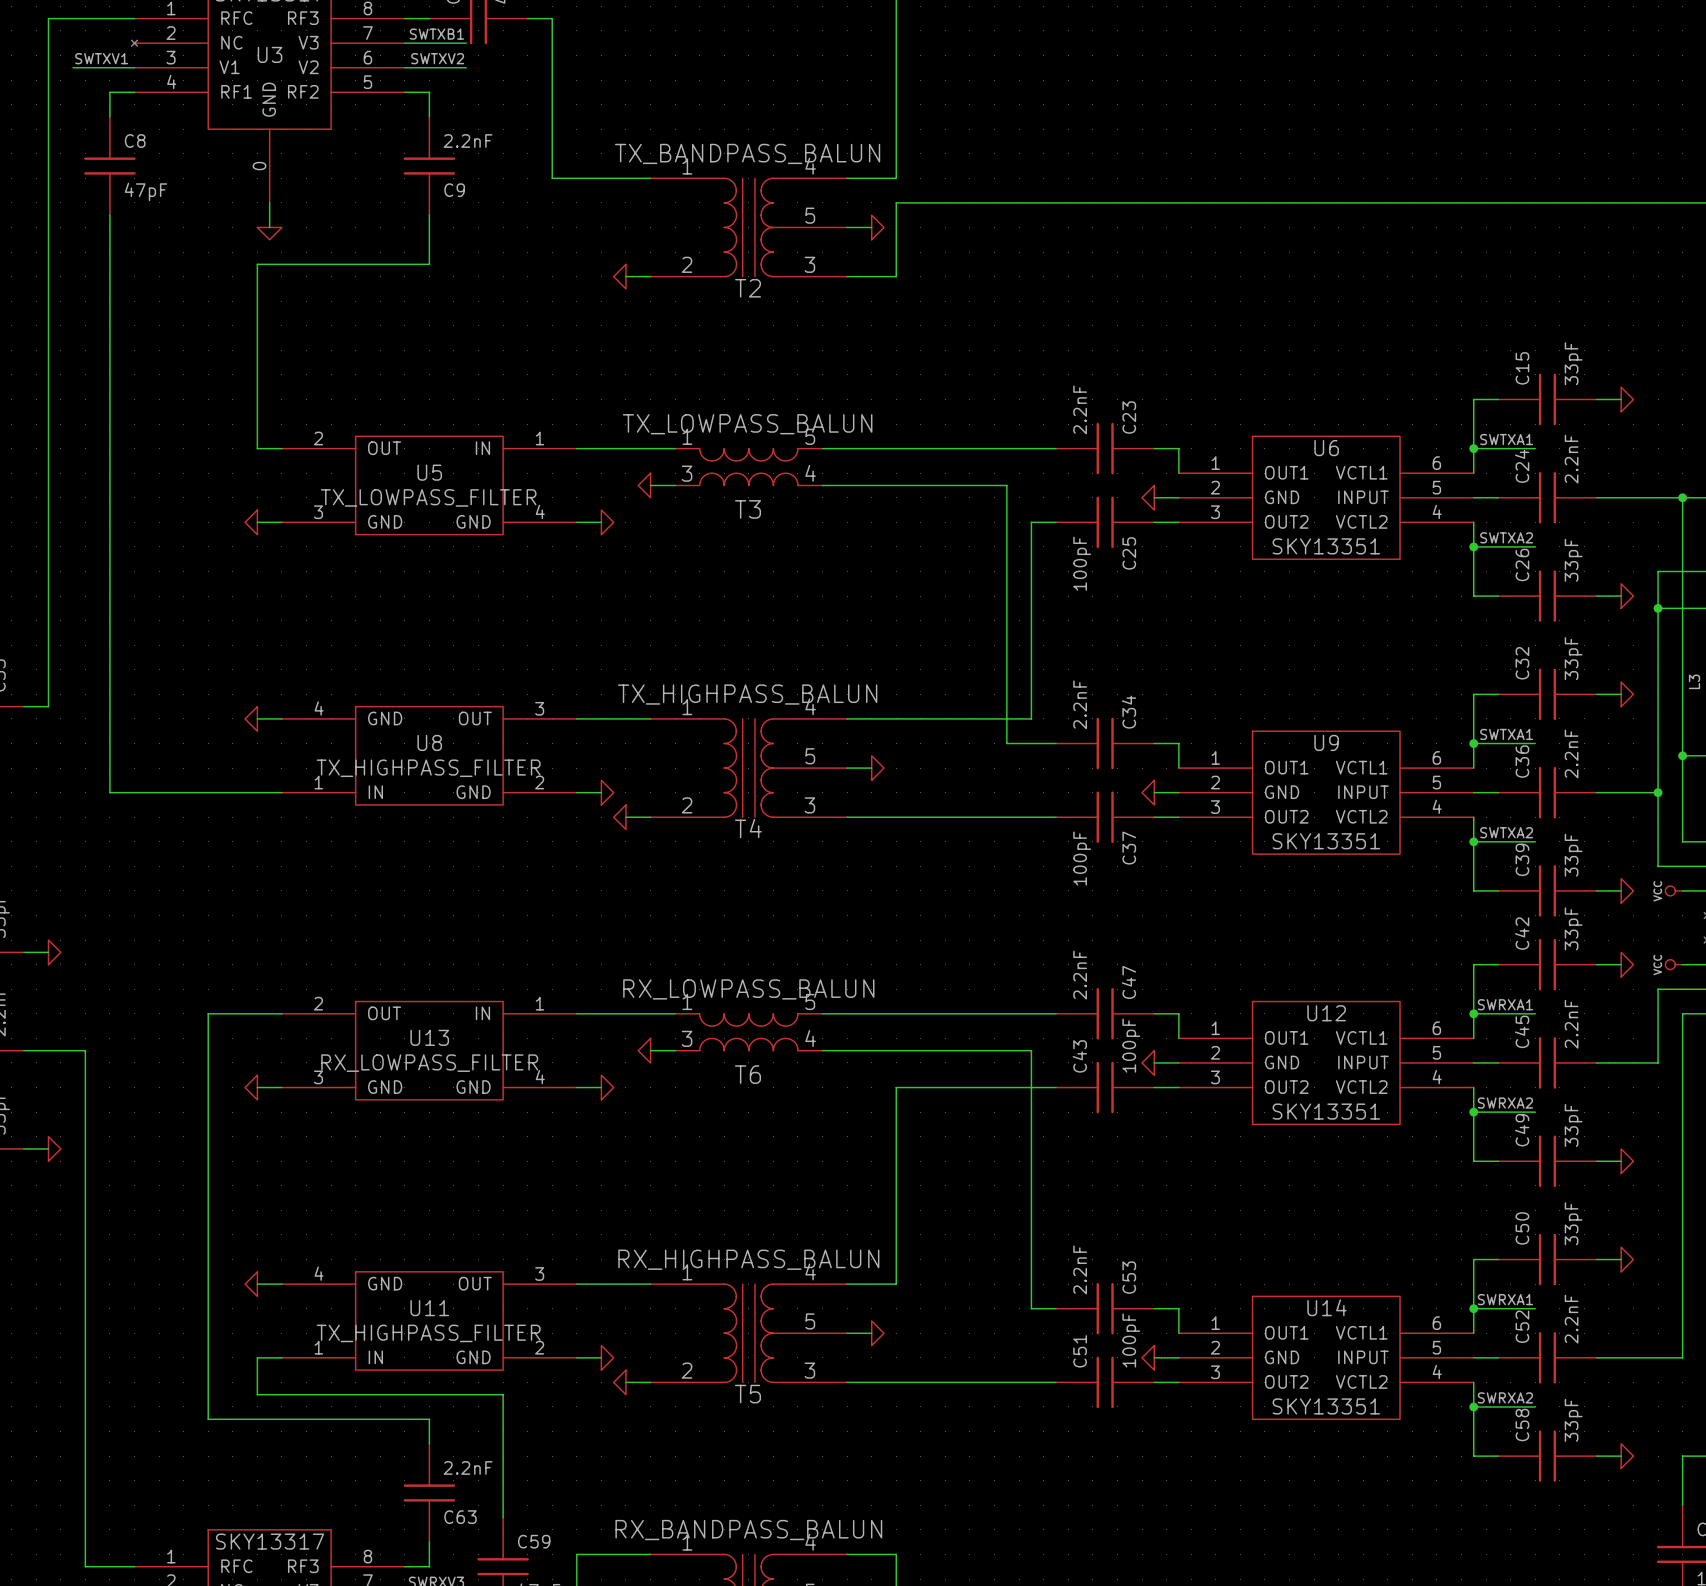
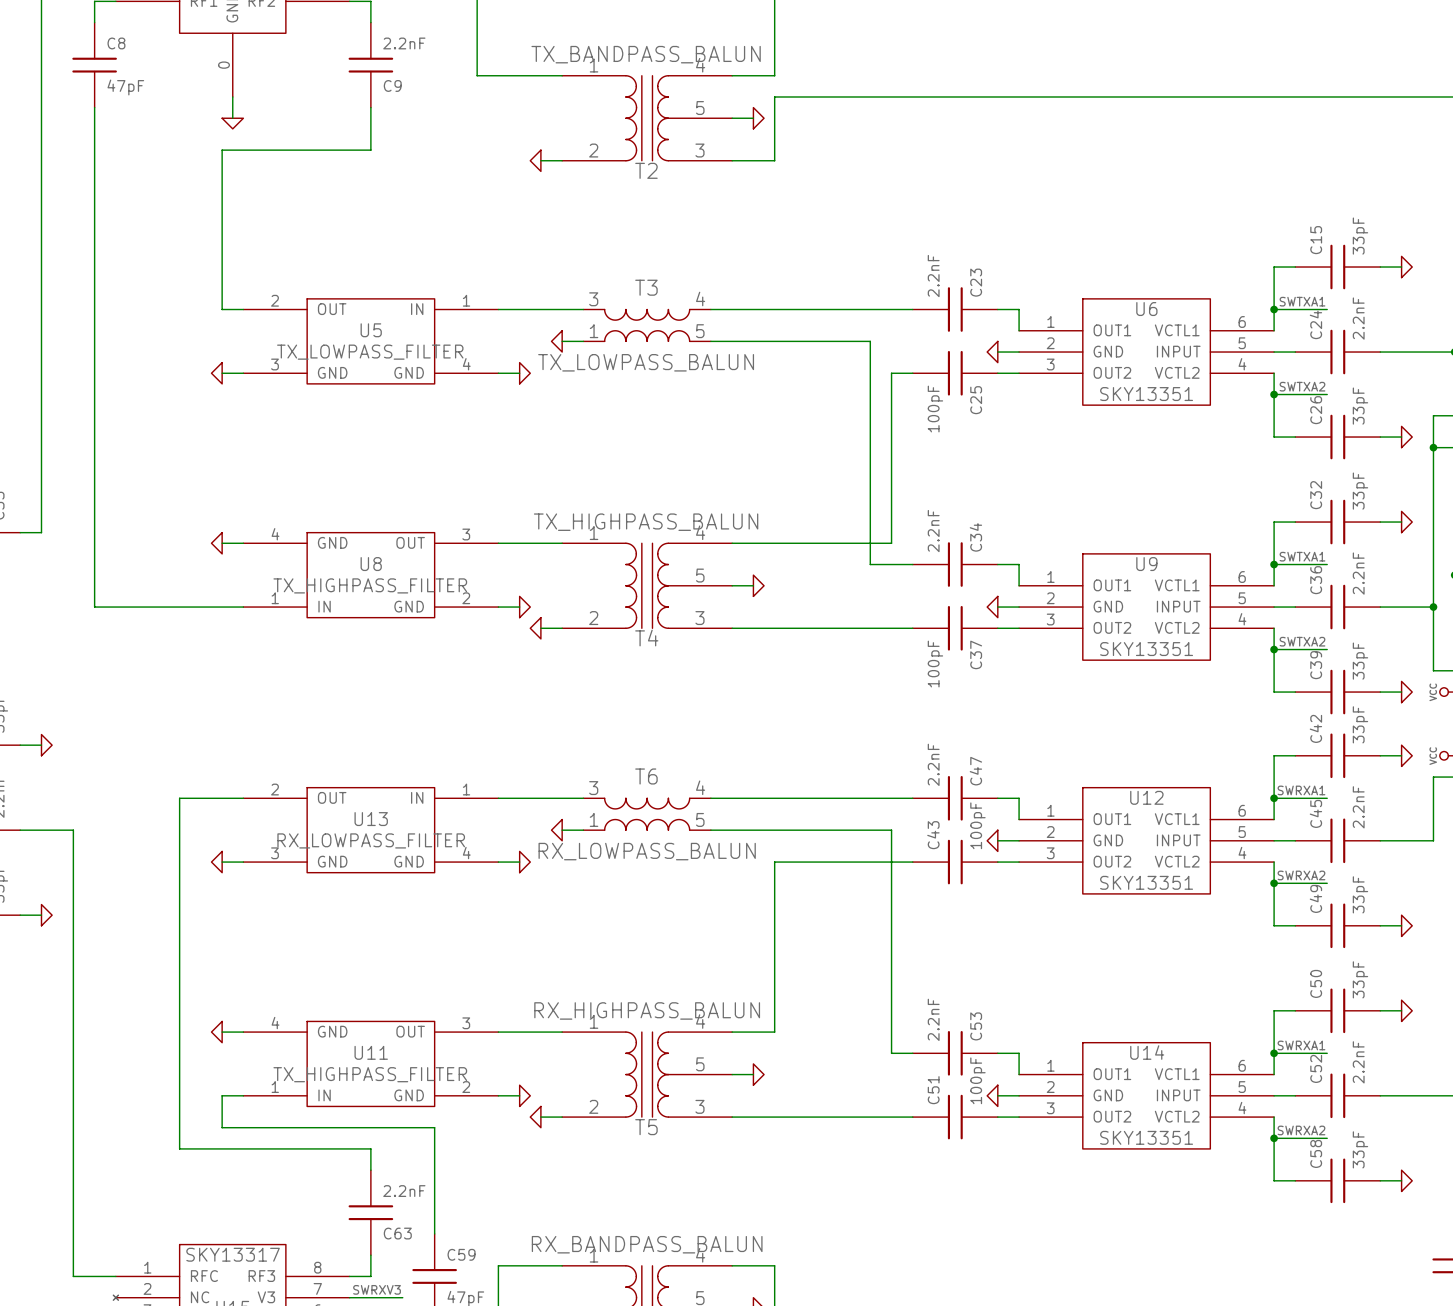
T3 flip: as is (748, 467) -> up-down (647, 325)
T6 flip: as is (748, 1032) -> up-down (647, 814)

